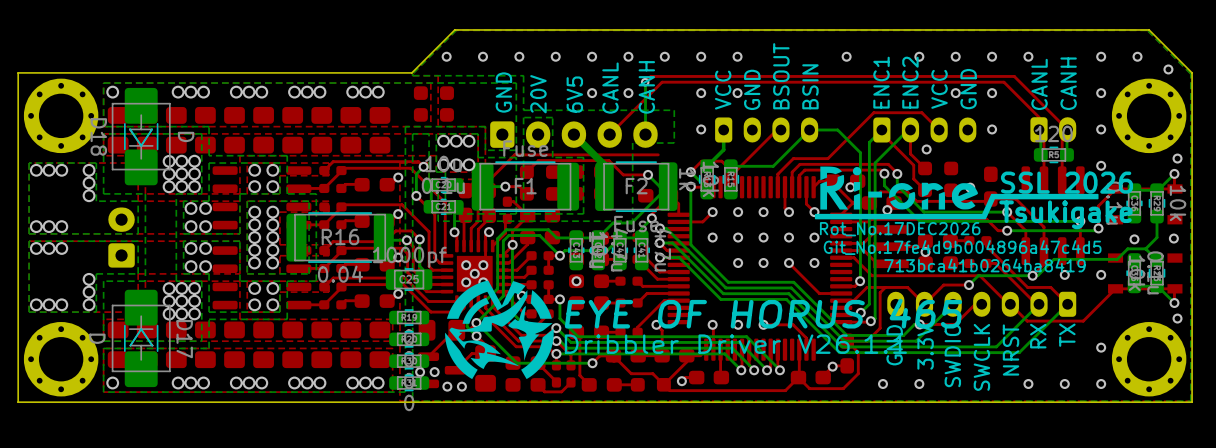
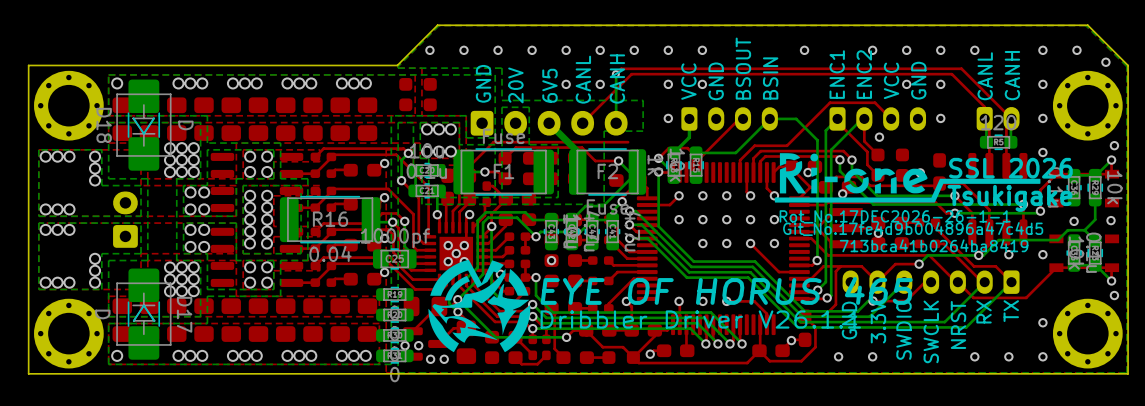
text: Rot_No.17DEC2026 (900, 229) -> Rot_No.17DEC2026-26-1-1 (895, 216)

